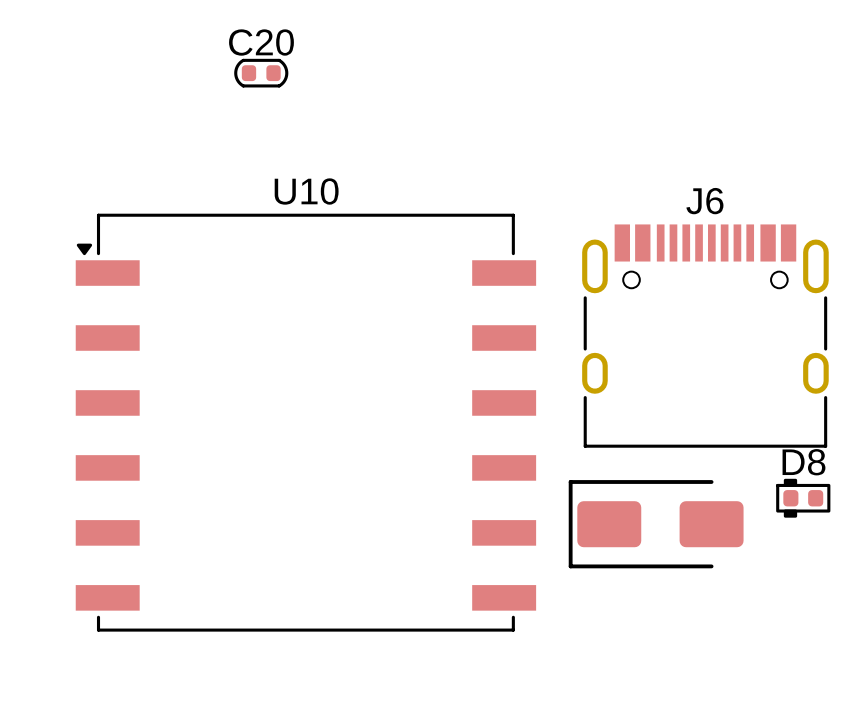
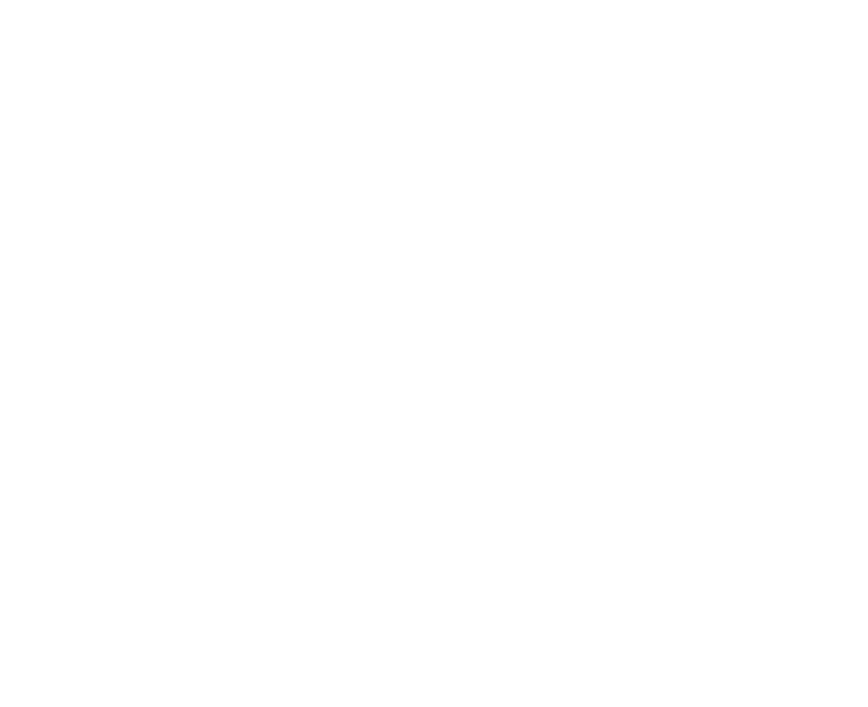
C20: (261, 73) -> none
J6: (705, 336) -> none
U10: (305, 422) -> none
D8: (803, 498) -> none
part: (656, 524) -> none

